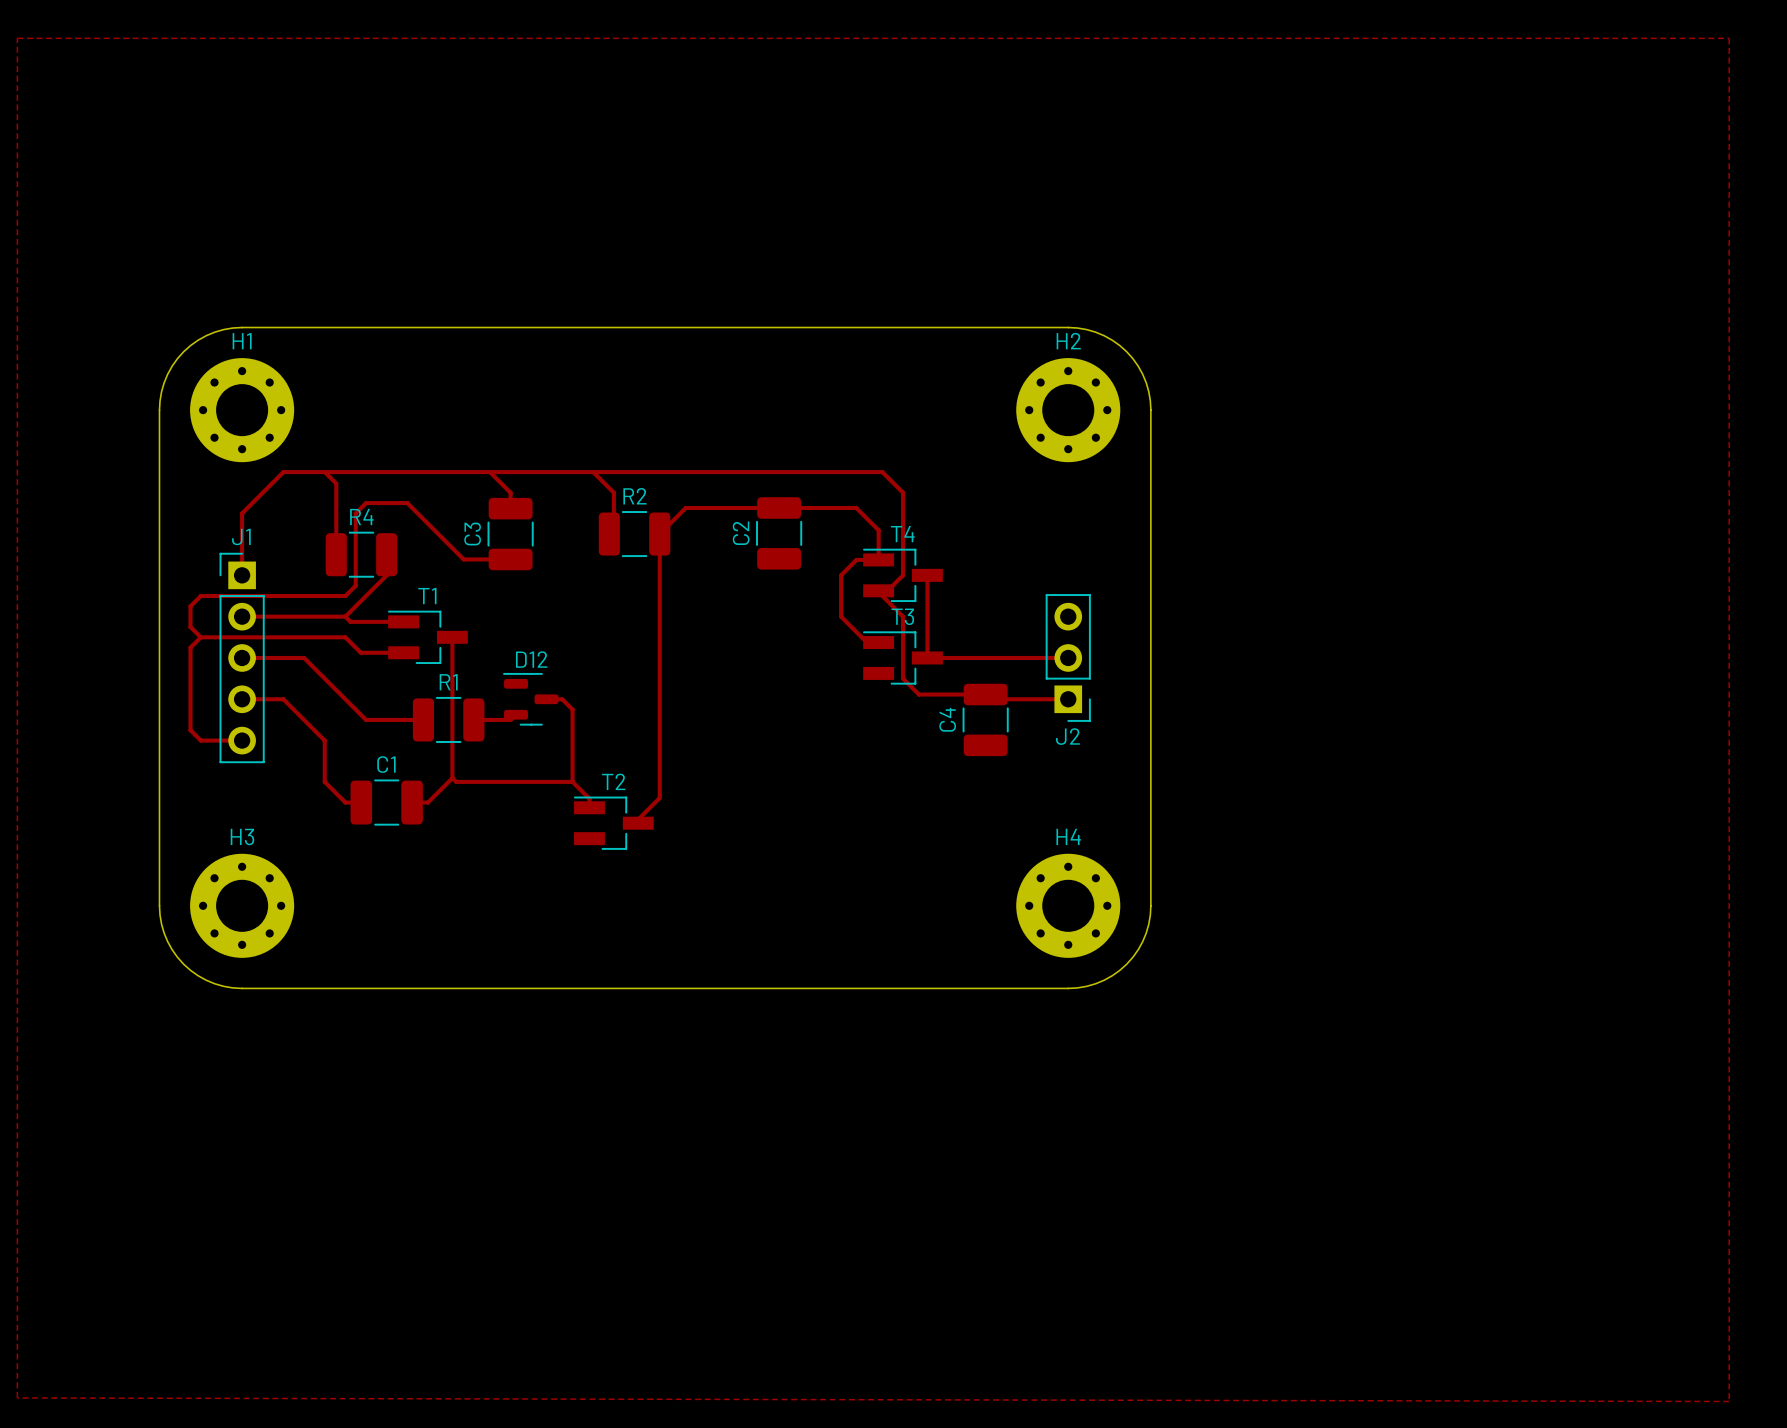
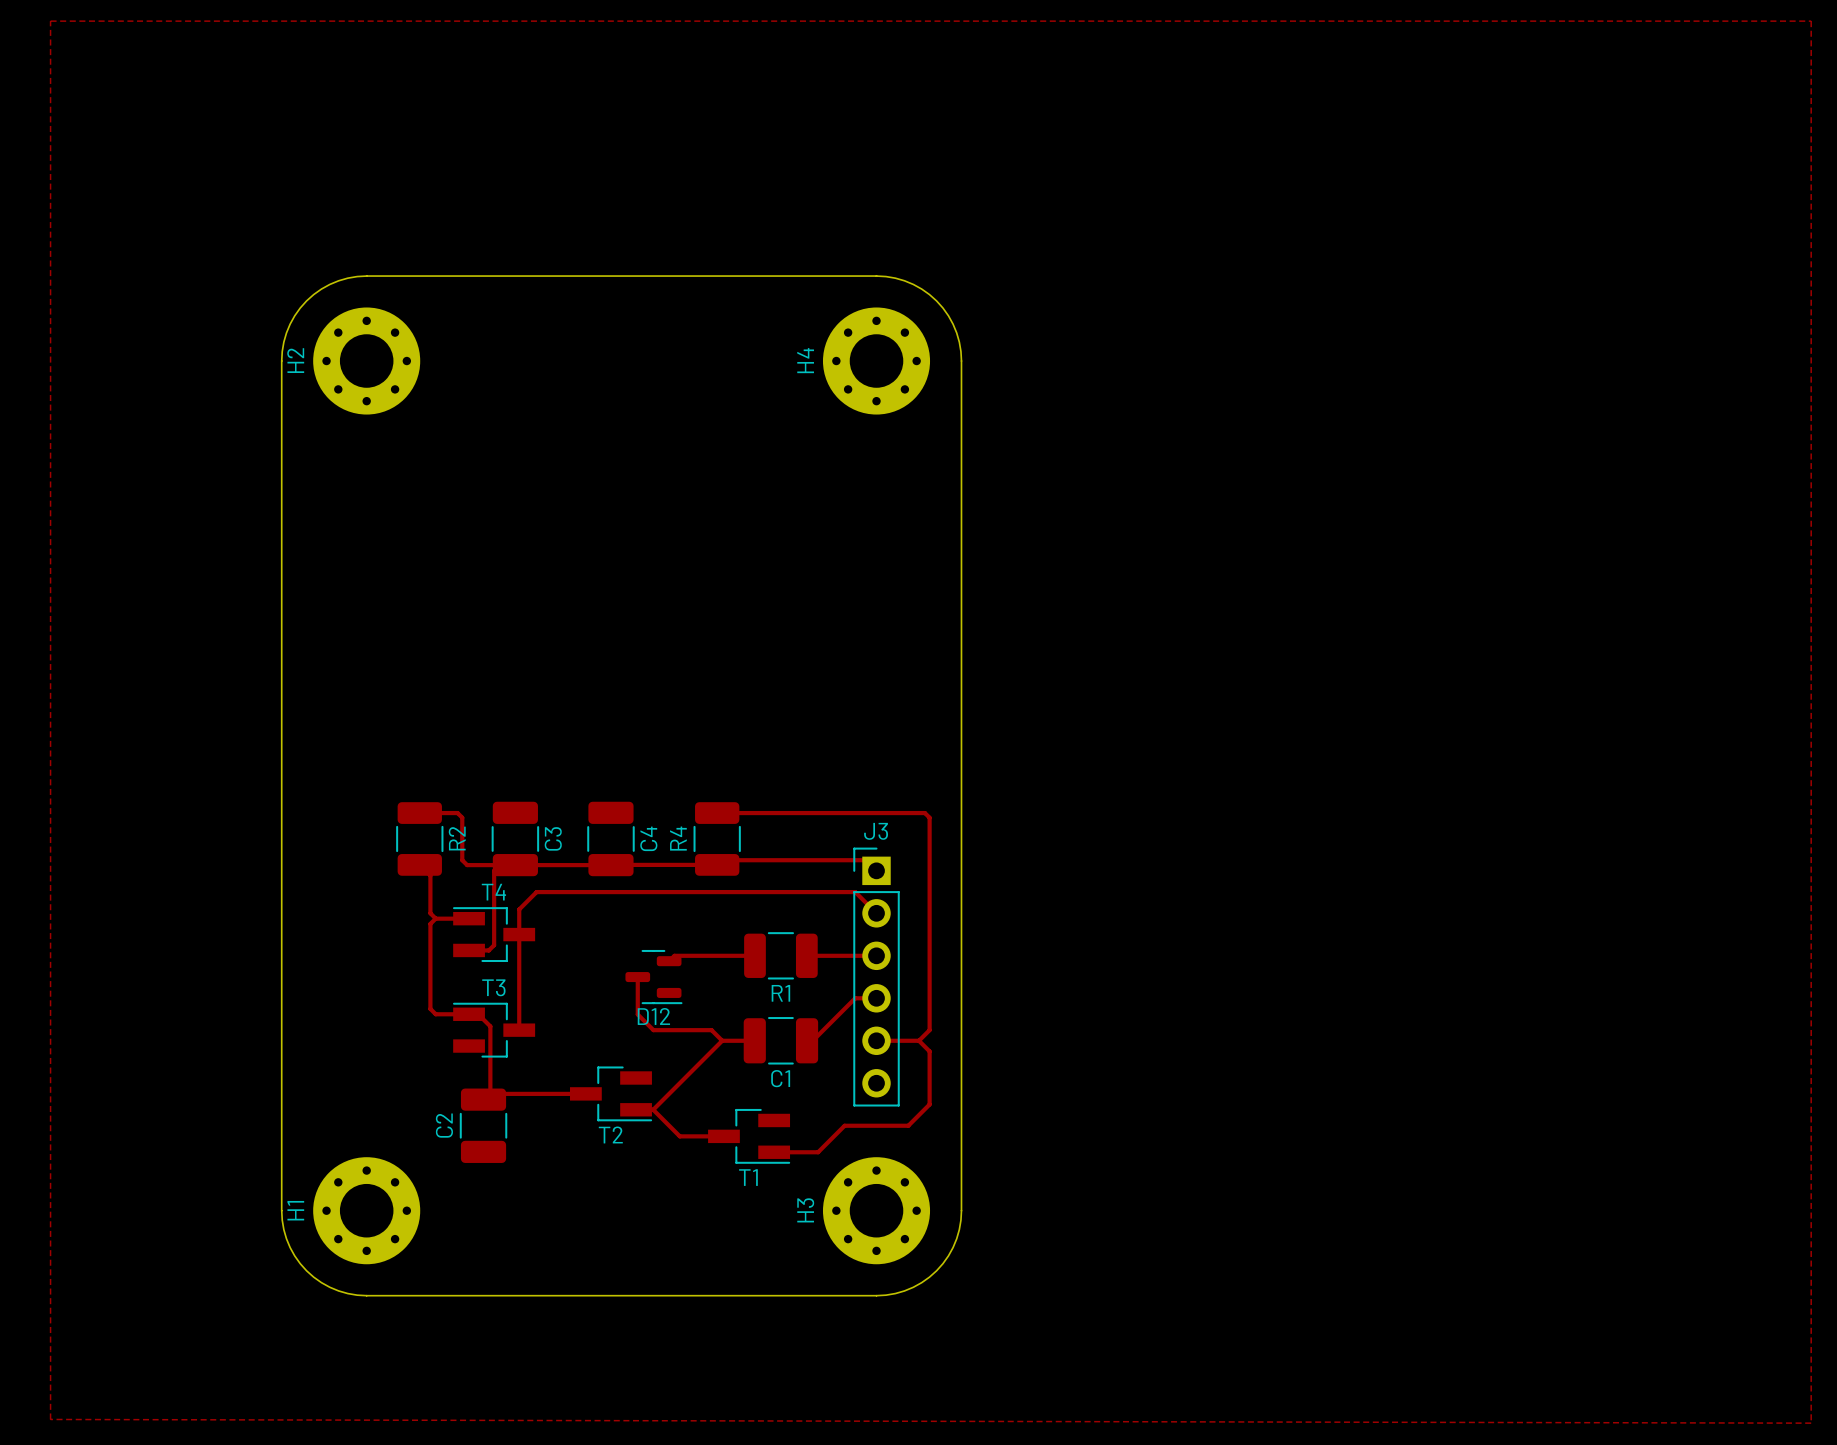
board edge: (242, 327) (1068, 327) (1086, 329) (1112, 340) (1132, 358) (1142, 374) (1148, 391) (1150, 410) (1150, 905) (1148, 924) (1138, 949) (1126, 964) (1112, 975) (1095, 983) (1068, 988) (242, 988) (214, 983) (198, 975) (183, 964) (172, 949) (164, 933) (160, 915) (160, 400) (167, 374) (183, 351) (206, 335) (223, 329) (242, 327) -> (366, 276) (347, 278) (329, 284) (306, 300) (290, 324) (282, 351) (281, 1210) (283, 1229) (290, 1247) (300, 1263) (313, 1277) (329, 1287) (357, 1295) (876, 1295) (895, 1293) (913, 1287) (929, 1277) (948, 1255) (956, 1238) (961, 1210) (961, 361) (959, 342) (953, 324) (936, 300) (921, 289) (904, 280) (886, 276) (366, 276)
H1 name rotation: 0° (242, 341) -> 90° counterclockwise (295, 1210)
H1 name position: H1 (242, 341) -> H1 (295, 1210)
H2 name rotation: 0° (1068, 341) -> 90° counterclockwise (295, 360)
H2 name position: H2 (1068, 341) -> H2 (295, 360)
H1 position: (242, 410) -> (366, 1210)
H2 position: (1068, 410) -> (366, 361)
track: (324, 472) (336, 483) (336, 554) -> none
track: (489, 472) (510, 492) (510, 508) -> none
track: (593, 472) (613, 492) (613, 529) (609, 534) -> none
R4 name position: R4 (361, 517) -> R4 (678, 838)
C3 name position: C3 (472, 533) -> C3 (553, 838)
C2 position: (779, 533) -> (483, 1125)
C3 position: (510, 534) -> (515, 838)
R2 rotation: 0° (634, 534) -> 90° clockwise (419, 838)
R2 position: (634, 534) -> (419, 838)
R4 rotation: 0° (361, 554) -> 90° clockwise (717, 838)
R4 position: (361, 554) -> (717, 838)
track: (386, 554) (386, 575) (345, 616) -> none
track: (510, 559) (463, 559) (407, 503) (366, 503) (355, 513) (355, 585) (345, 596) (200, 596) (190, 606) (190, 626) (200, 637) -> none
track: (242, 575) (242, 513) (283, 472) (882, 472) (903, 492) (903, 575) (887, 590) (878, 590) (903, 616) (903, 678) (918, 694) (985, 694) (990, 699) (1068, 699) -> none
T4 position: (902, 575) -> (494, 934)
track: (927, 575) (927, 657) (1068, 657) -> none
track: (242, 616) (345, 616) -> none
track: (345, 616) (350, 621) (403, 621) -> none
track: (200, 637) (190, 647) (190, 730) (200, 740) (242, 740) -> none
track: (200, 637) (345, 637) (360, 652) (403, 652) -> none
T1 rotation: 0° (427, 637) -> 180° (749, 1136)
T1 position: (427, 637) -> (749, 1136)
track: (452, 637) (452, 778) -> none
track: (878, 642) (866, 642) (841, 616) (841, 575) (856, 559) (878, 559) (878, 530) (856, 507) (685, 507) (659, 534) (659, 798) (638, 819) (638, 823) -> none
track: (242, 657) (304, 657) (366, 719) (423, 719) -> none
J1: (242, 657) -> none
T3 position: (902, 657) -> (494, 1030)
J2: (1068, 657) -> none
R1 name position: R1 (448, 682) -> R1 (780, 993)
track: (242, 699) (283, 699) (324, 740) (324, 781) (345, 802) (361, 802) -> none
D12 rotation: 0° (530, 699) -> 180° (653, 977)
D12 position: (530, 699) -> (653, 977)
track: (546, 699) (562, 699) (572, 709) (572, 781) -> none
track: (516, 714) (510, 719) (473, 719) -> none
R1 position: (448, 719) -> (780, 955)
C4 name position: C4 (947, 719) -> C4 (648, 838)
C4 position: (985, 719) -> (610, 838)
C1 name position: C1 (386, 764) -> C1 (780, 1078)
track: (452, 778) (456, 781) (572, 781) -> none
track: (452, 778) (427, 802) (412, 802) -> none
track: (572, 781) (589, 798) (589, 807) -> none
C1 position: (386, 802) -> (780, 1040)
track: none -> (419, 813) (457, 813) (462, 817) (462, 860) (467, 865) (610, 865)
track: none -> (717, 813) (924, 813) (929, 817) (929, 1030) (918, 1040)
T2 rotation: 0° (613, 823) -> 180° (611, 1093)
T2 position: (613, 823) -> (611, 1093)
H4 name rotation: 0° (1068, 836) -> 90° counterclockwise (805, 360)
H4 name position: H4 (1068, 836) -> H4 (805, 360)
H3 name rotation: 0° (242, 837) -> 90° counterclockwise (805, 1210)
H3 name position: H3 (242, 837) -> H3 (805, 1210)
track: none -> (419, 864) (430, 875) (430, 913) (435, 918)
track: none -> (499, 865) (494, 870) (494, 945) (488, 950) (469, 950)
track: none -> (611, 864) (717, 864) (721, 860) (865, 860) (876, 870)
H3 position: (242, 905) -> (876, 1210)
track: none -> (876, 913) (855, 892) (536, 892) (519, 909) (519, 1030)
H4 position: (1068, 905) -> (876, 361)
track: none -> (435, 918) (469, 918)
track: none -> (435, 918) (430, 923) (430, 1008) (435, 1014) (478, 1014) (490, 1026) (489, 1093) (585, 1093)
track: none -> (754, 955) (674, 955) (669, 961)
track: none -> (806, 955) (876, 955)
track: none -> (637, 977) (637, 1014) (653, 1030) (711, 1030) (722, 1040)
J3: none -> (876, 977)
track: none -> (876, 998) (855, 998) (812, 1040) (807, 1040)
track: none -> (722, 1040) (754, 1040)
track: none -> (722, 1040) (653, 1109)
track: none -> (876, 1040) (918, 1040)
track: none -> (918, 1040) (929, 1051) (929, 1104) (908, 1125) (844, 1125) (818, 1152) (774, 1152)
track: none -> (653, 1109) (679, 1136) (723, 1136)

